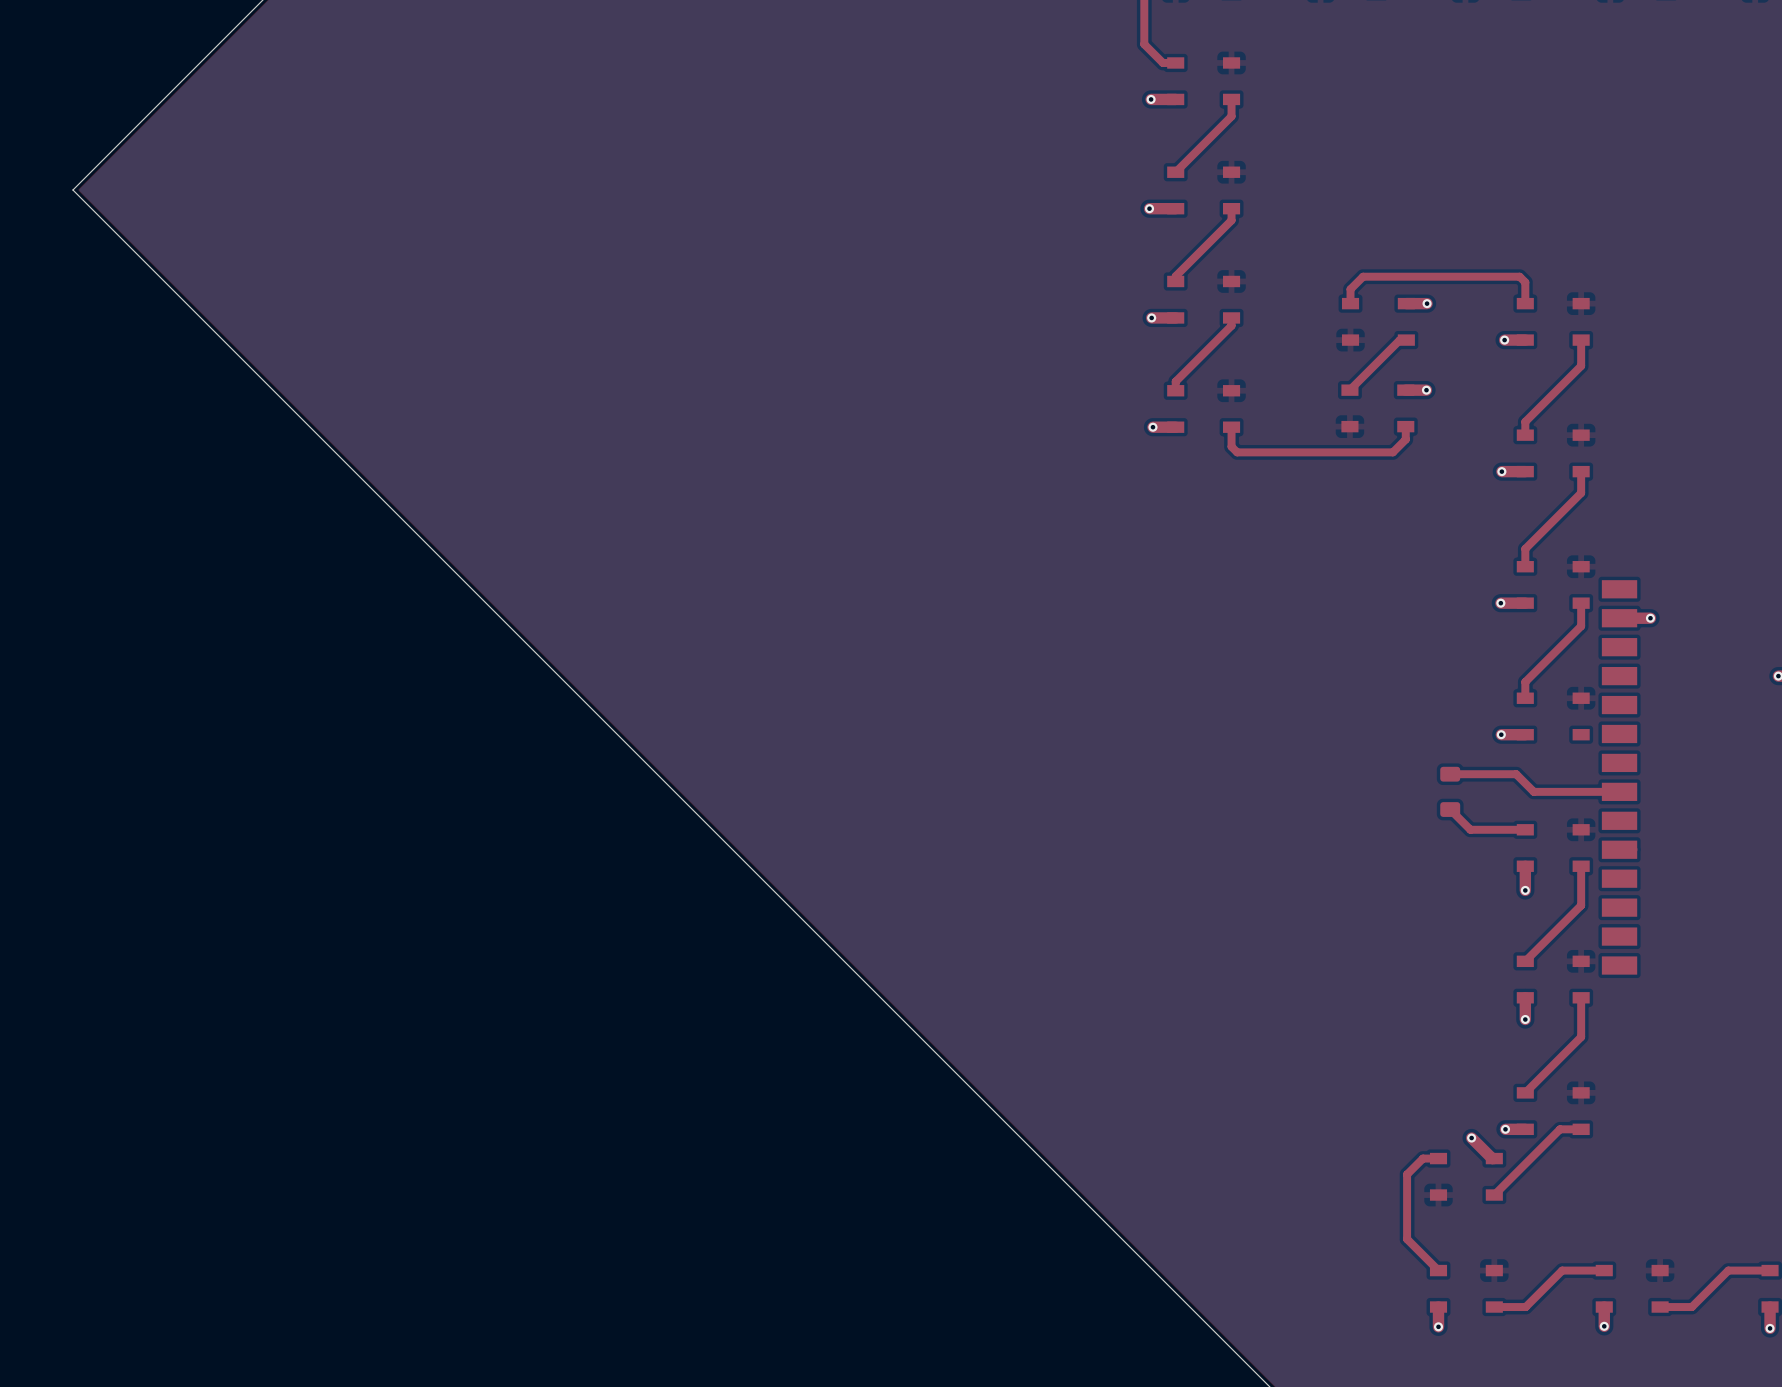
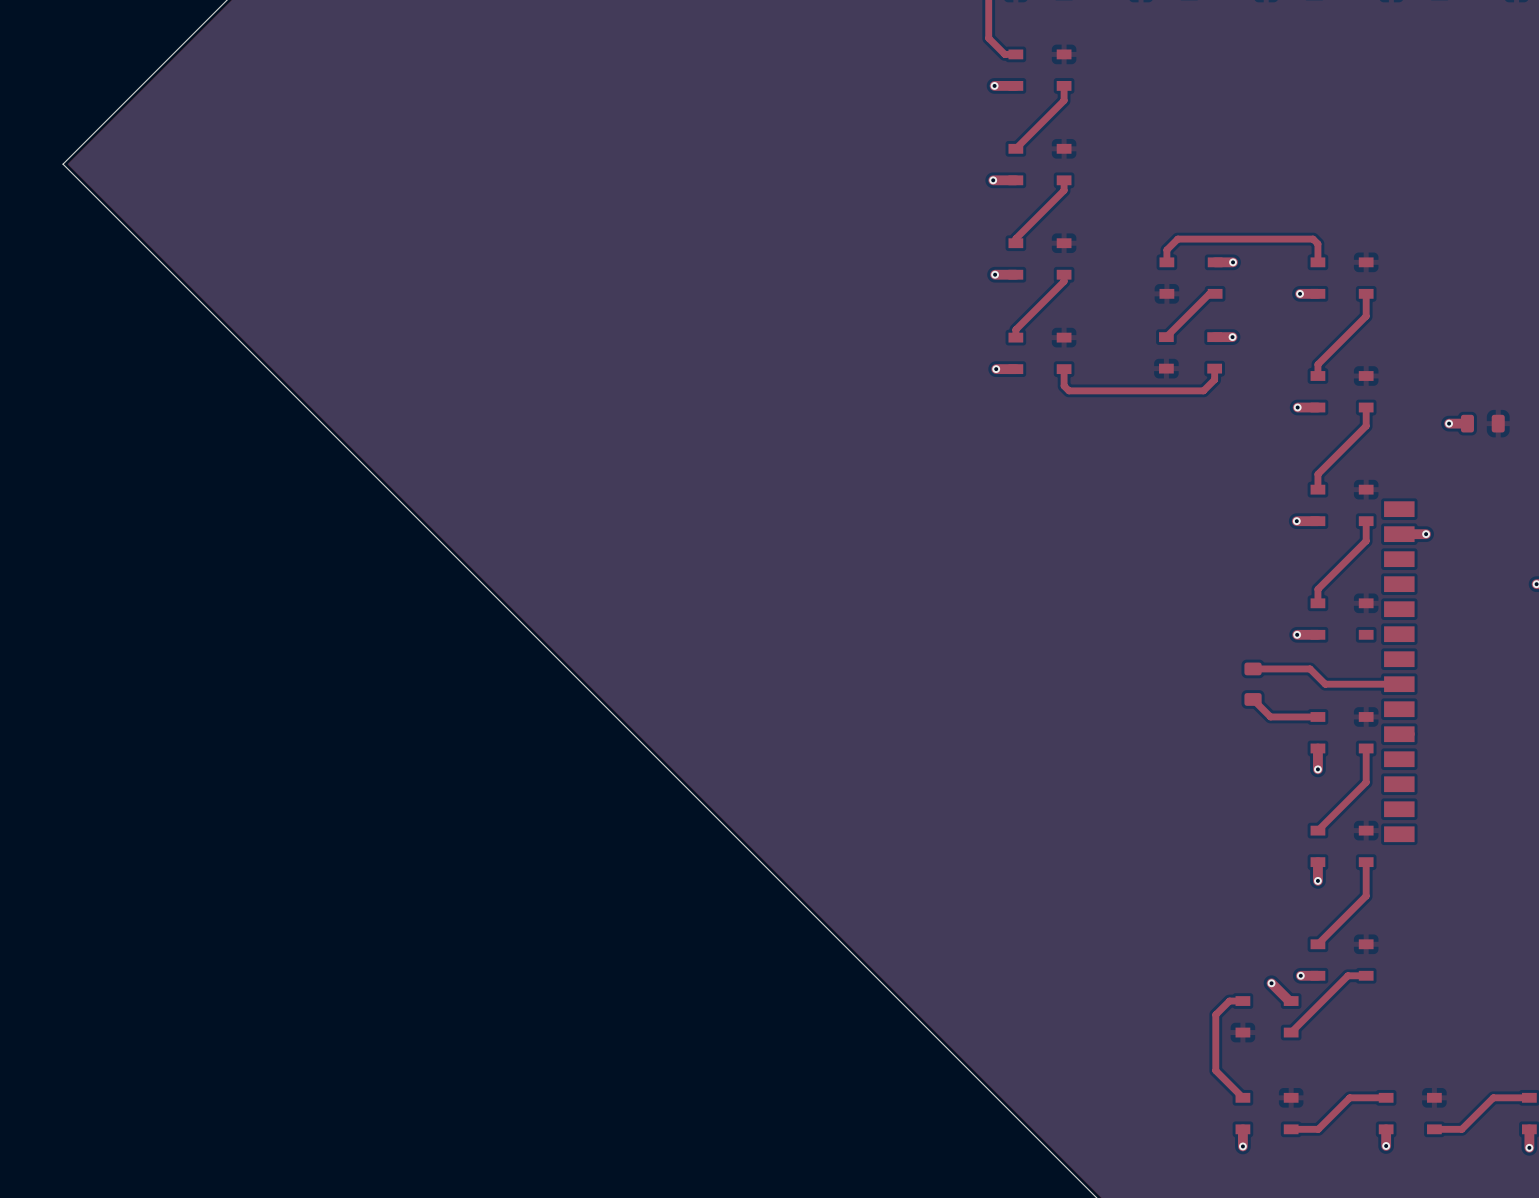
via: none -> (1449, 423)
top track: none -> (1467, 423) (1449, 423)
part: none -> (1482, 423)

